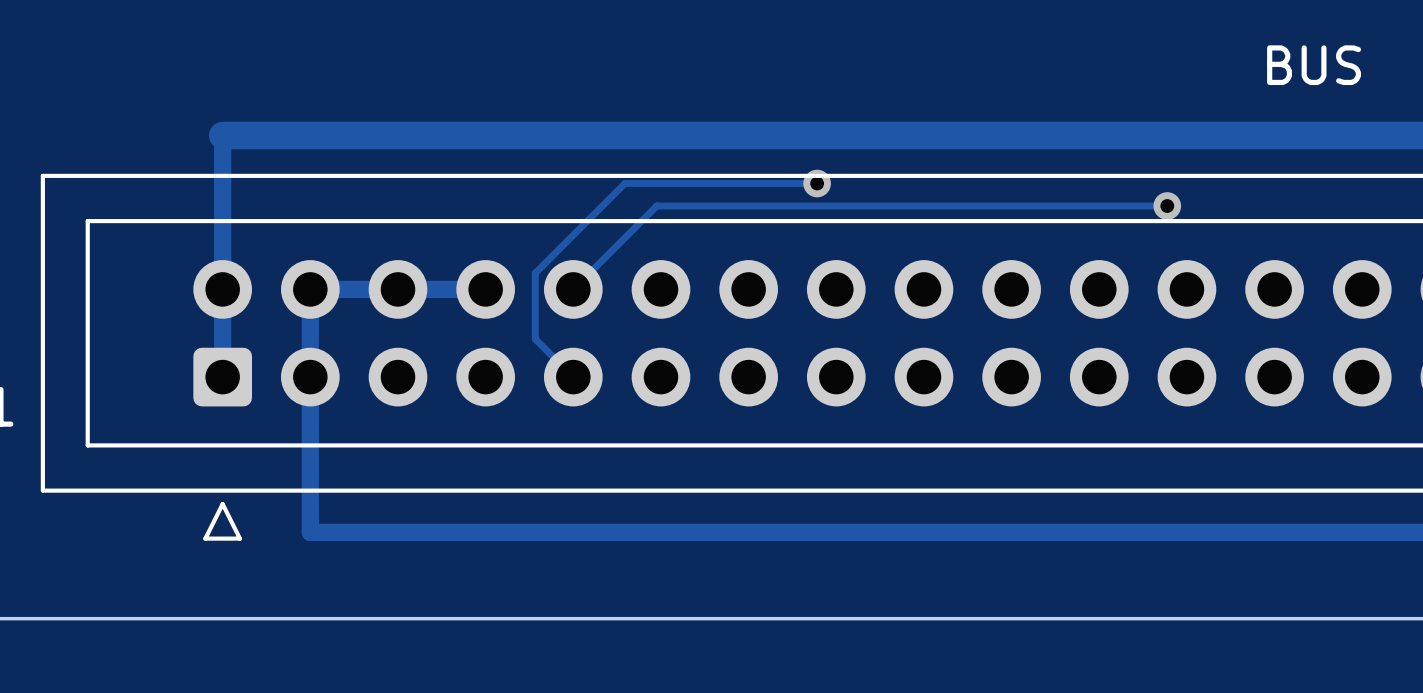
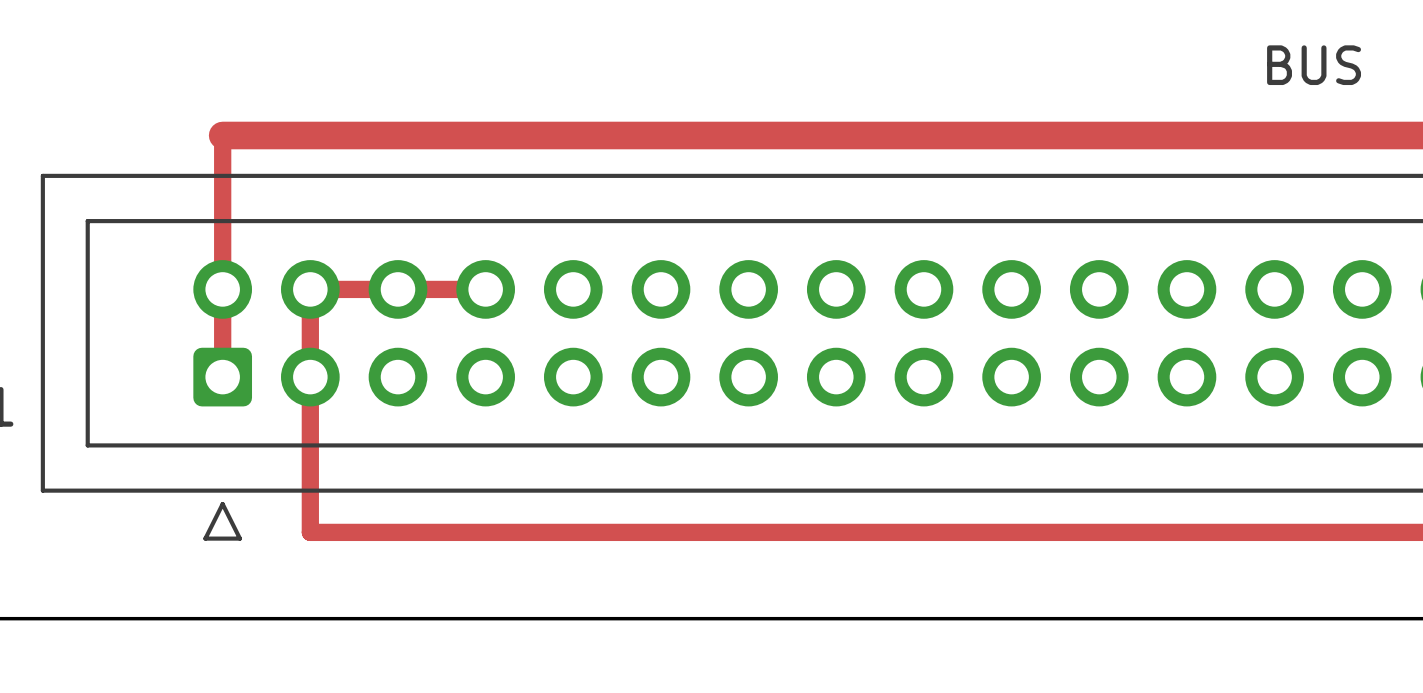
track: (817, 183) (624, 183) (535, 273) (535, 339) (573, 377) -> none
via: (817, 183) -> none
track: (1167, 206) (656, 206) (573, 289) -> none
via: (1167, 206) -> none

